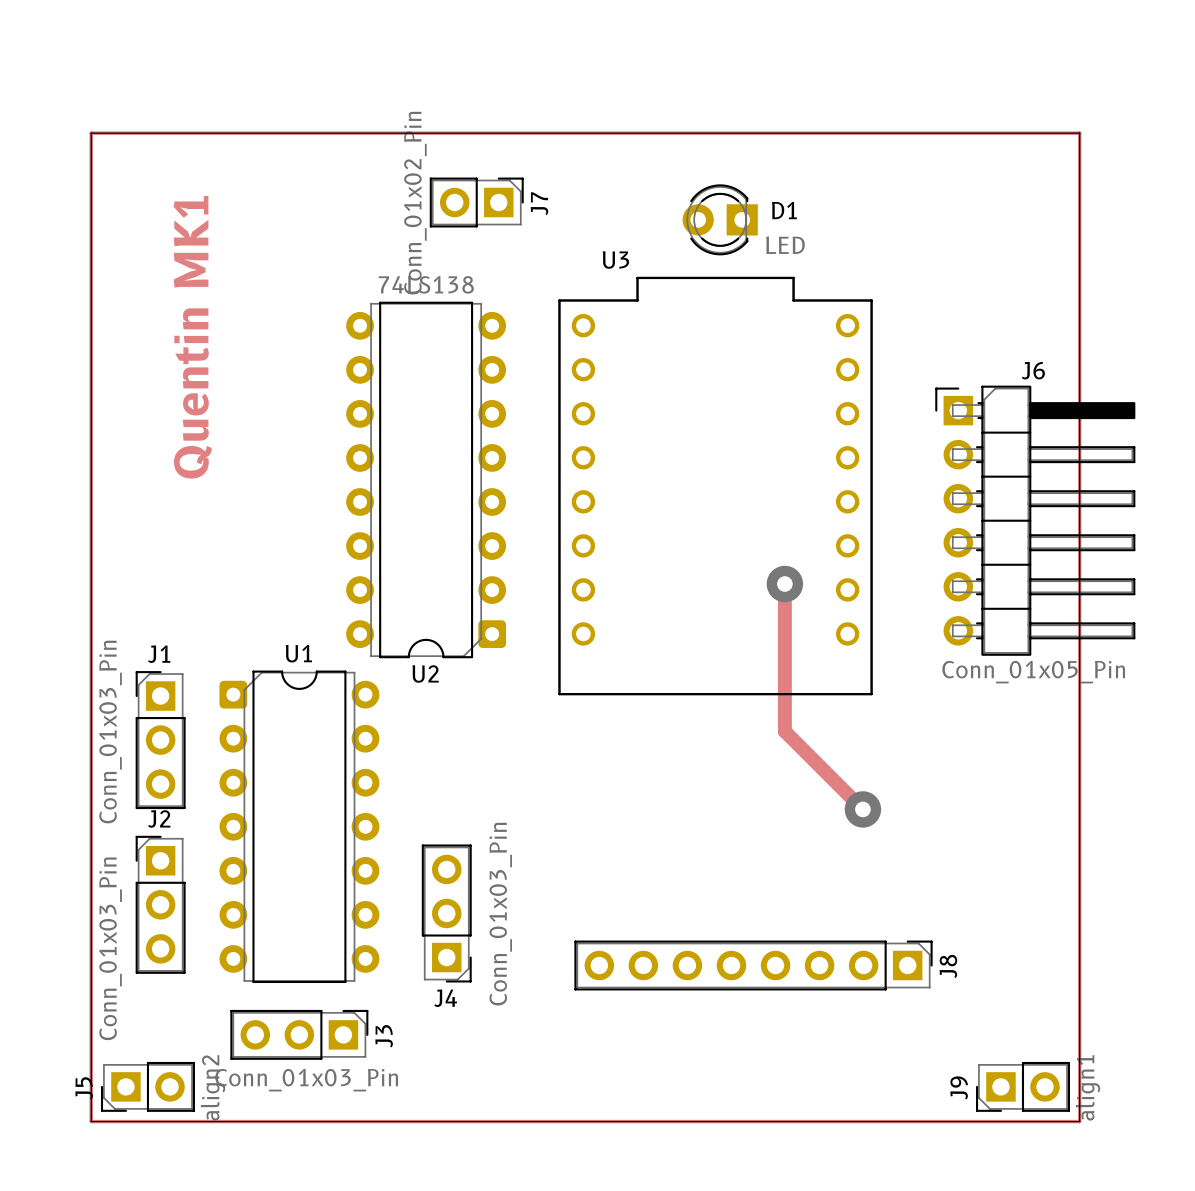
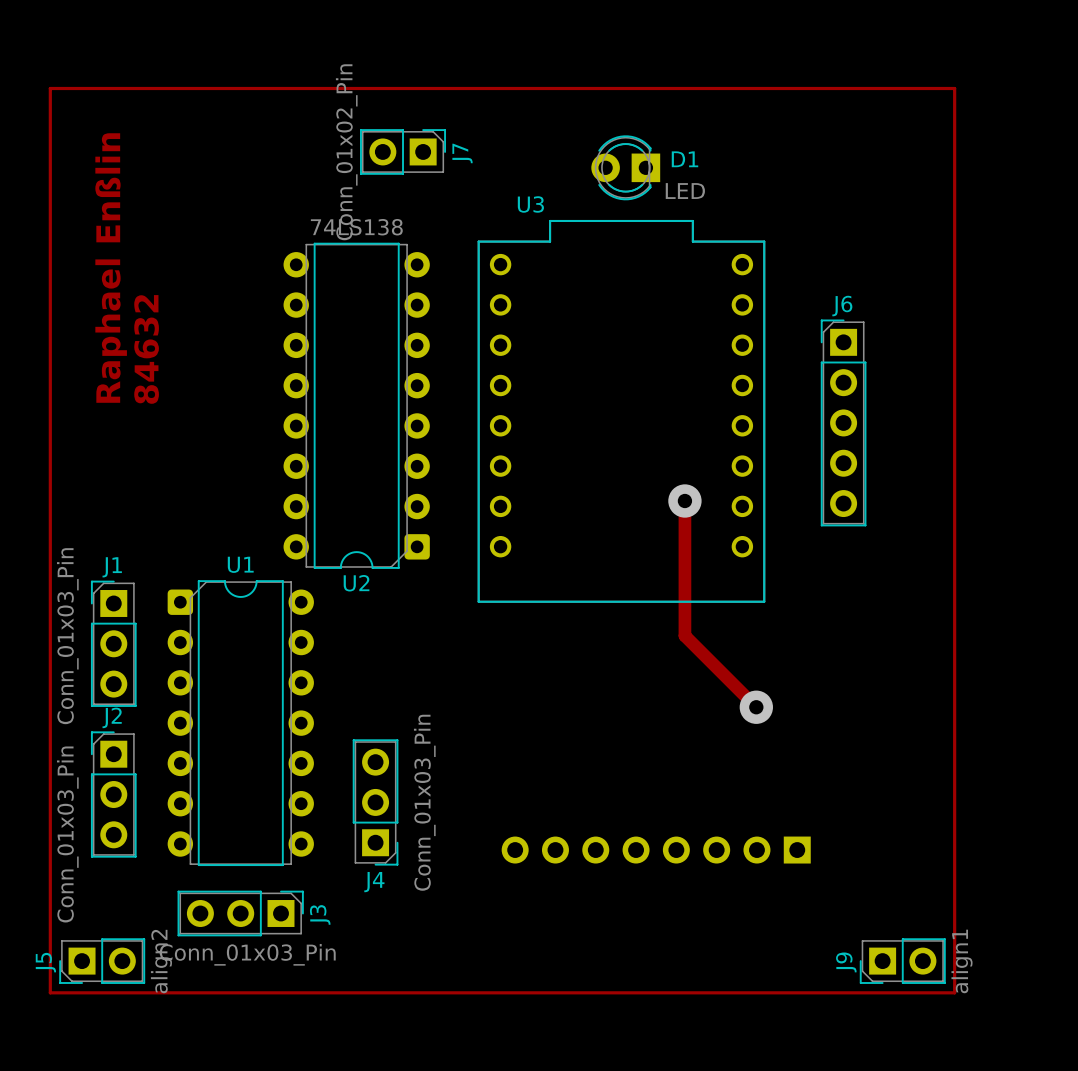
board edge: (91, 133) (1079, 133) (1079, 1121) (91, 1121) (91, 133) -> none
text: Quentin MK1 (192, 337) -> 84632 (146, 349)
text: none -> Raphael Enßlin (111, 268)
J6 footprint: [935, 385, 1136, 656] -> [820, 319, 867, 527]
J6 value: Conn_01x05_Pin (1033, 672) -> none
J8 side: top (753, 965) -> bottom (656, 850)

